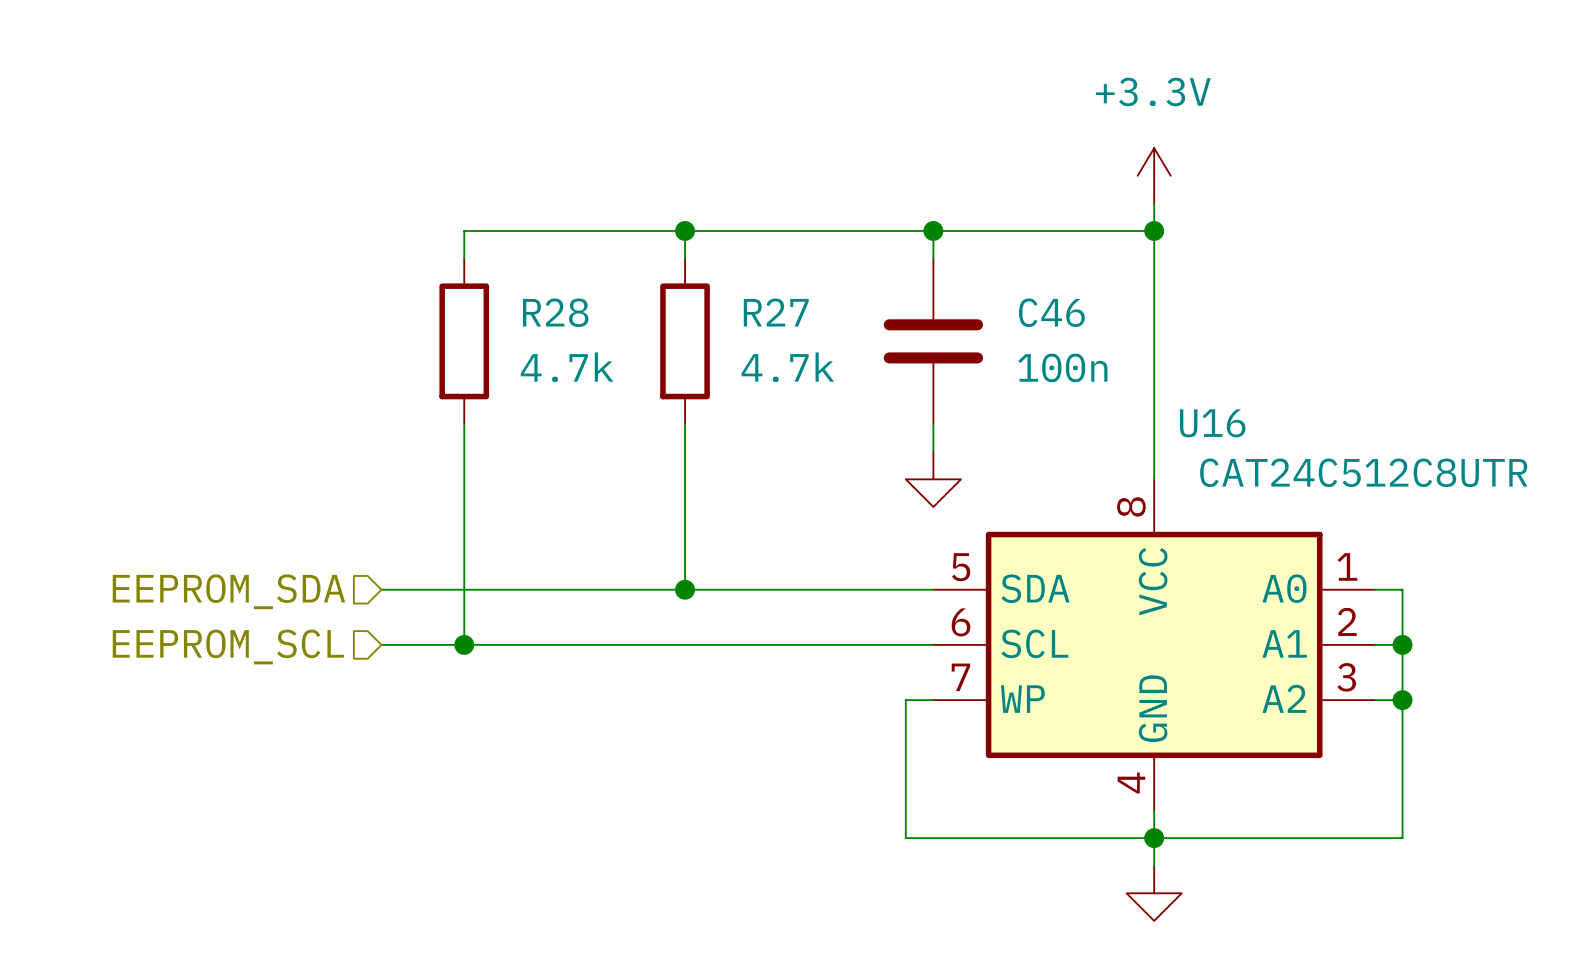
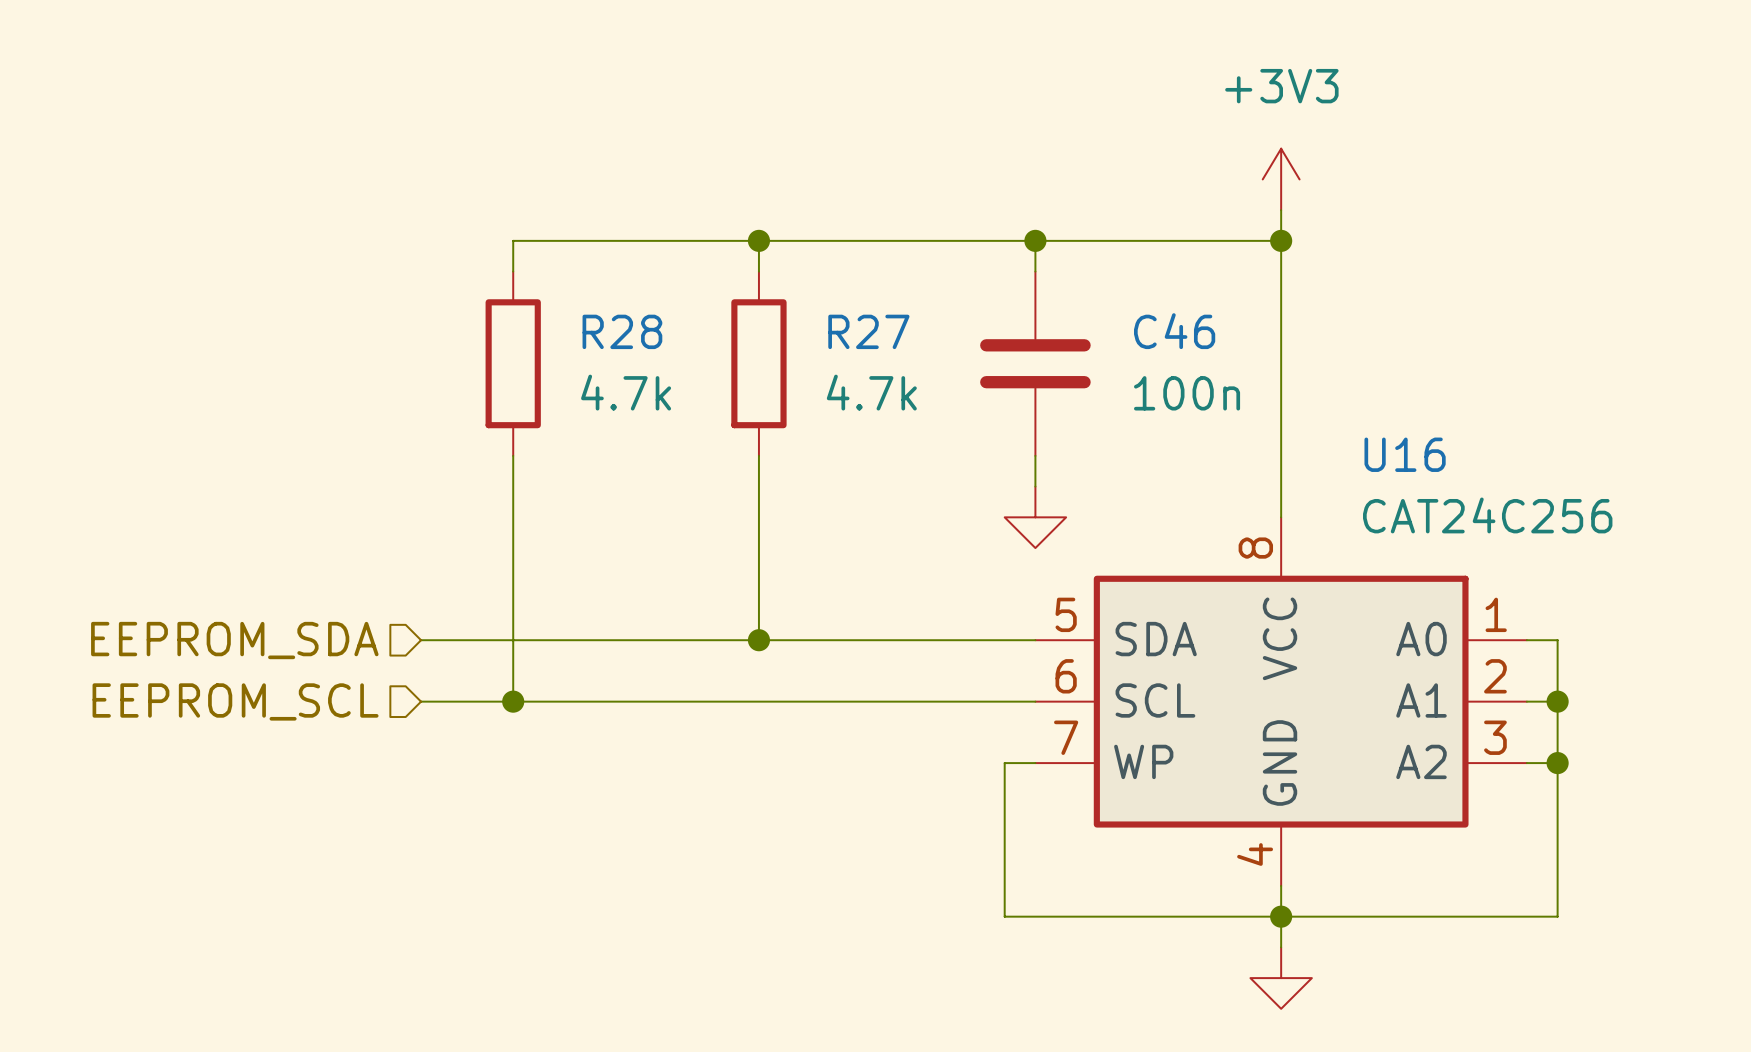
power symbol: +3.3V (1154, 175) -> +3V3 (1281, 179)
U16 name position: U16 (1212, 423) -> U16 (1405, 454)
U16 value: CAT24C512C8UTR (1363, 472) -> CAT24C256 (1487, 515)

